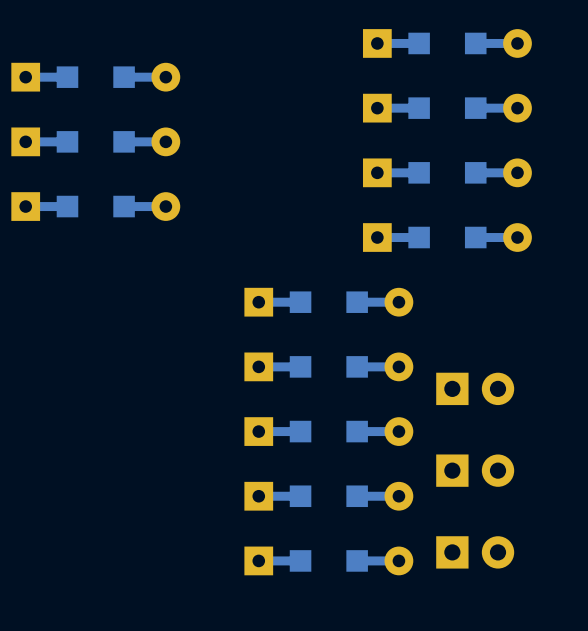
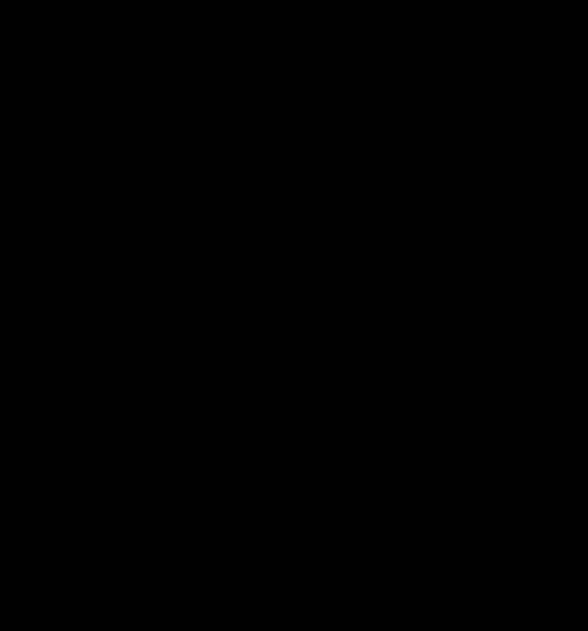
part: (447, 43) -> none
part: (95, 77) -> none
part: (447, 108) -> none
part: (95, 141) -> none
part: (447, 172) -> none
part: (95, 206) -> none
part: (447, 237) -> none
part: (328, 302) -> none
part: (328, 366) -> none
part: (475, 388) -> none
part: (328, 431) -> none
part: (475, 470) -> none
part: (328, 496) -> none
part: (475, 552) -> none
part: (328, 560) -> none

